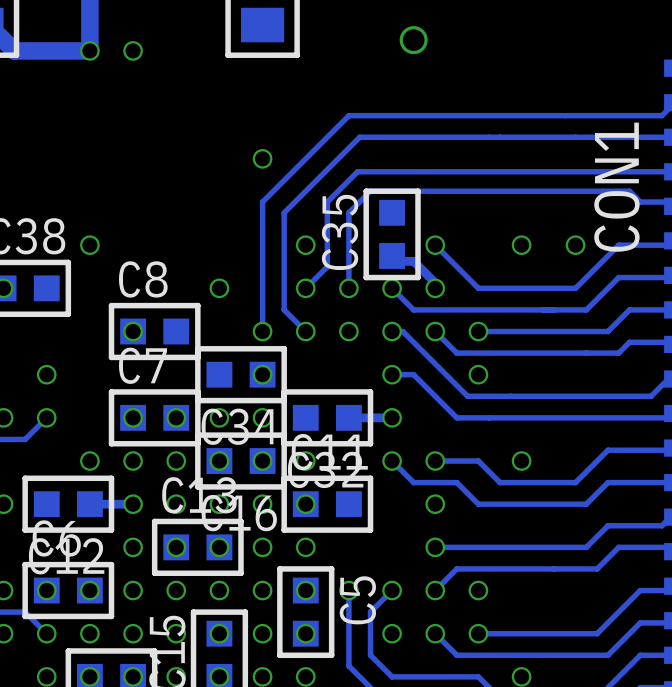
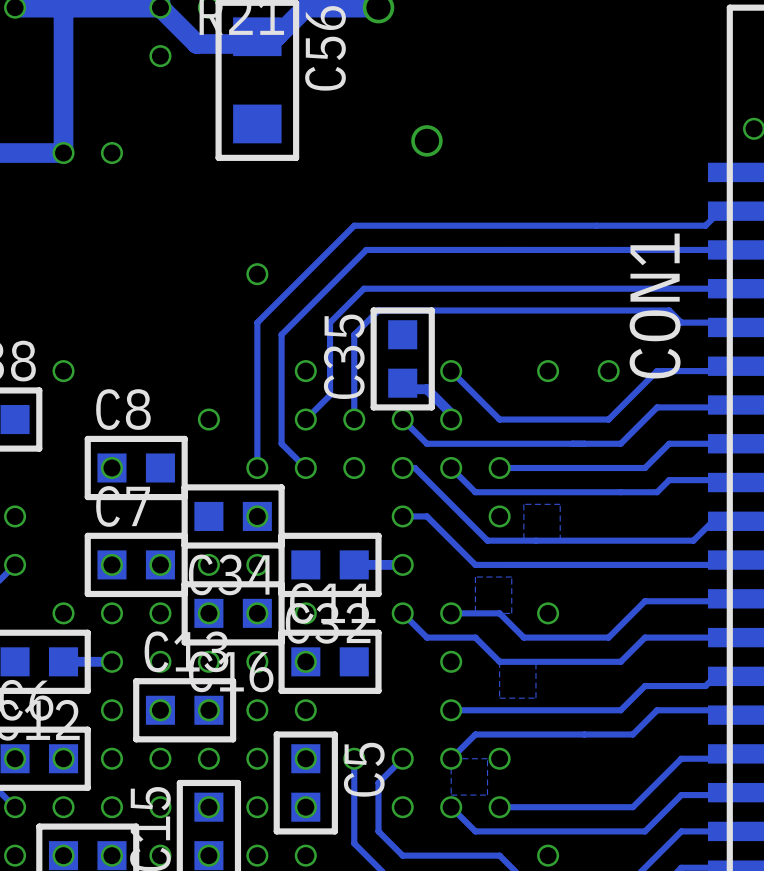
zone outline: none -> (560, 504) (560, 540) (523, 540) (523, 504) (560, 504)
zone outline: none -> (511, 577) (511, 613) (475, 613) (475, 577) (511, 577)
zone outline: none -> (535, 661) (535, 698) (499, 698) (499, 661) (535, 661)
zone outline: none -> (487, 758) (487, 795) (451, 795) (451, 758) (487, 758)

